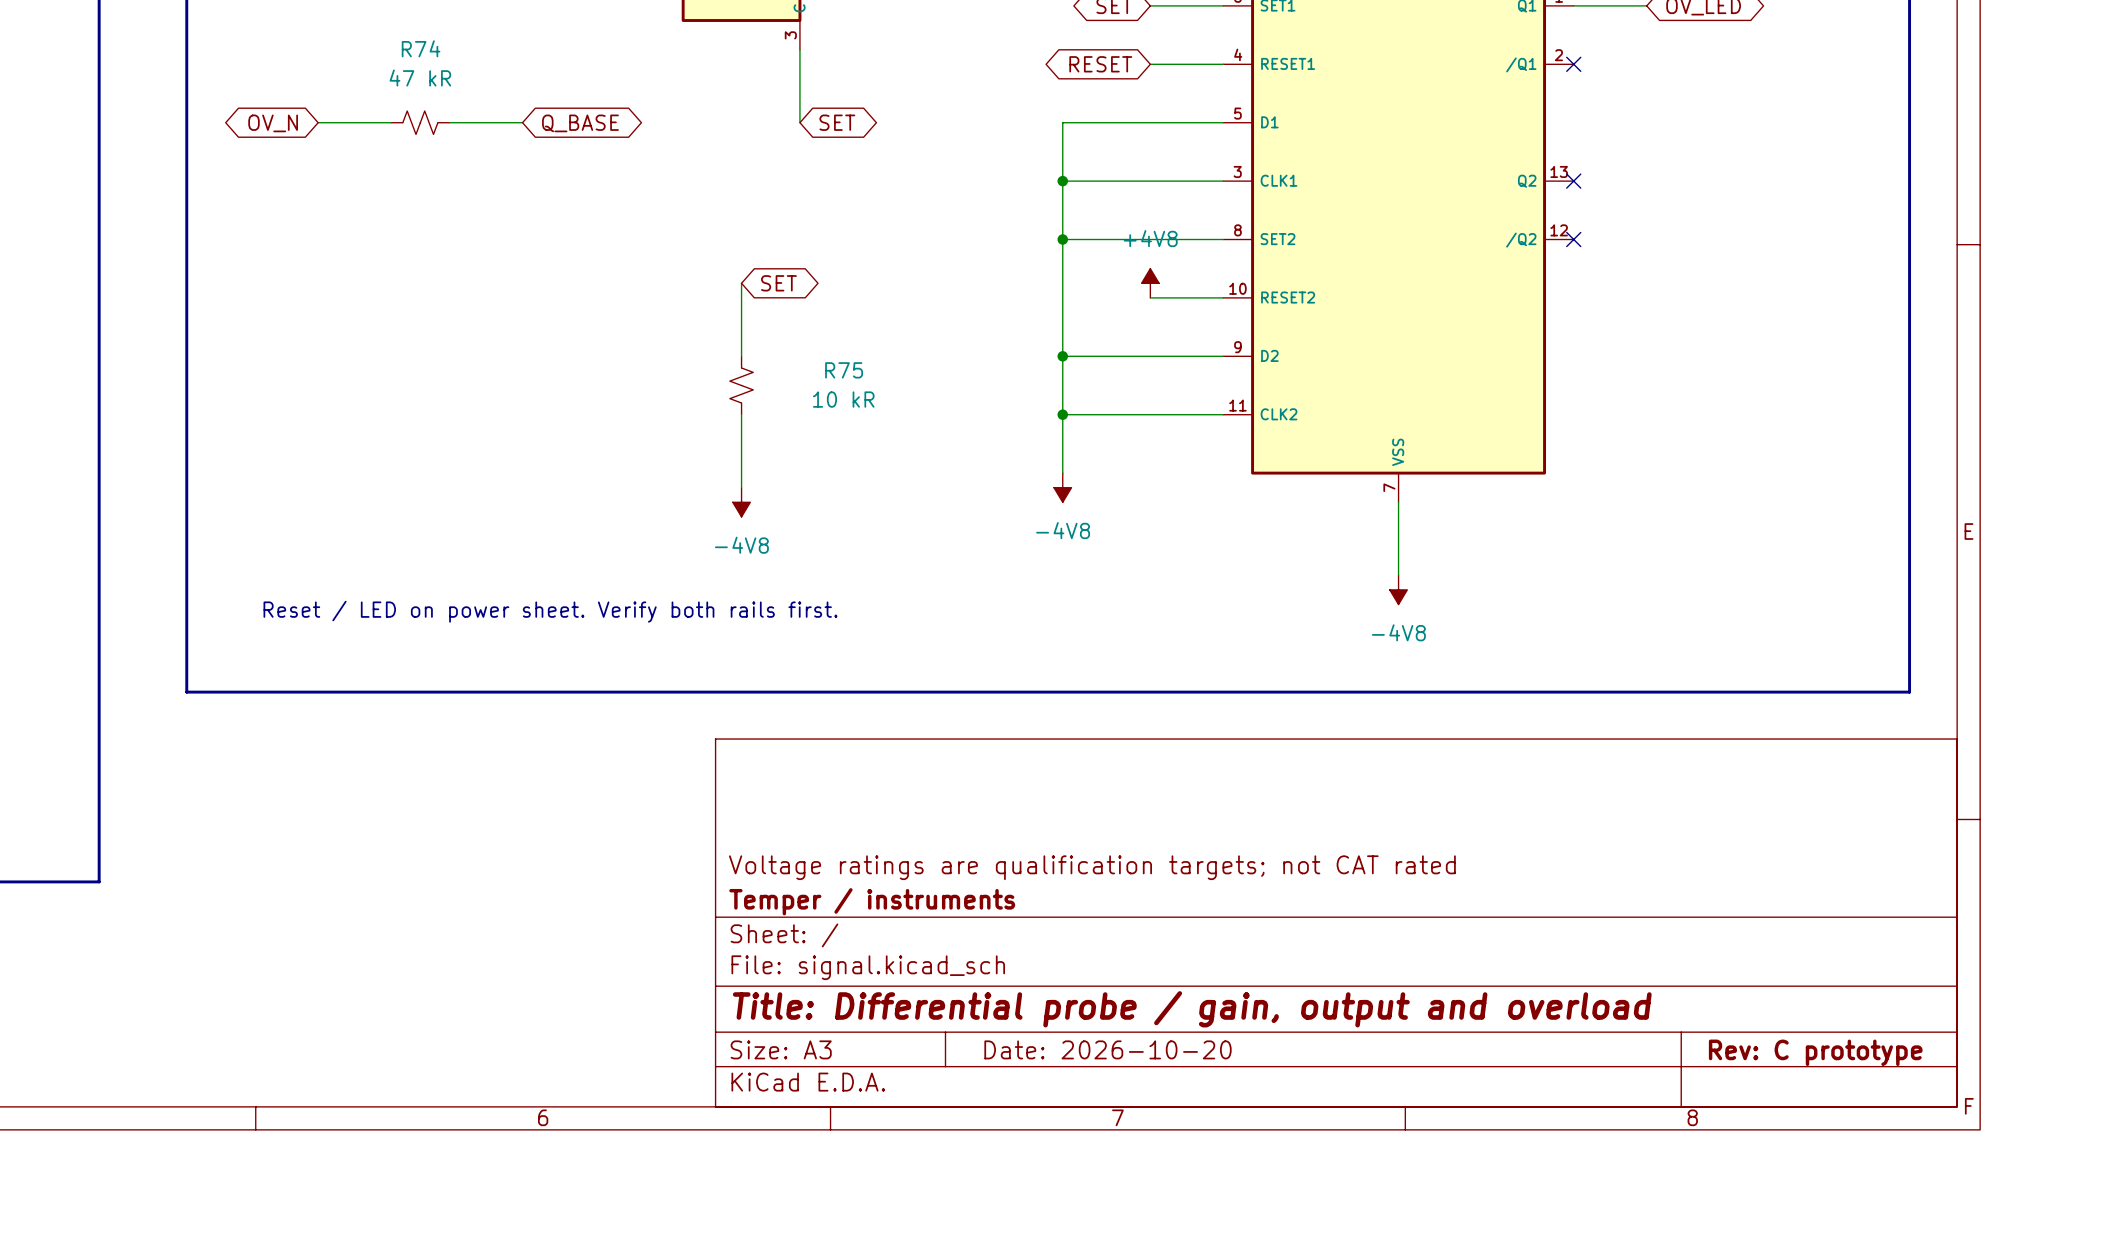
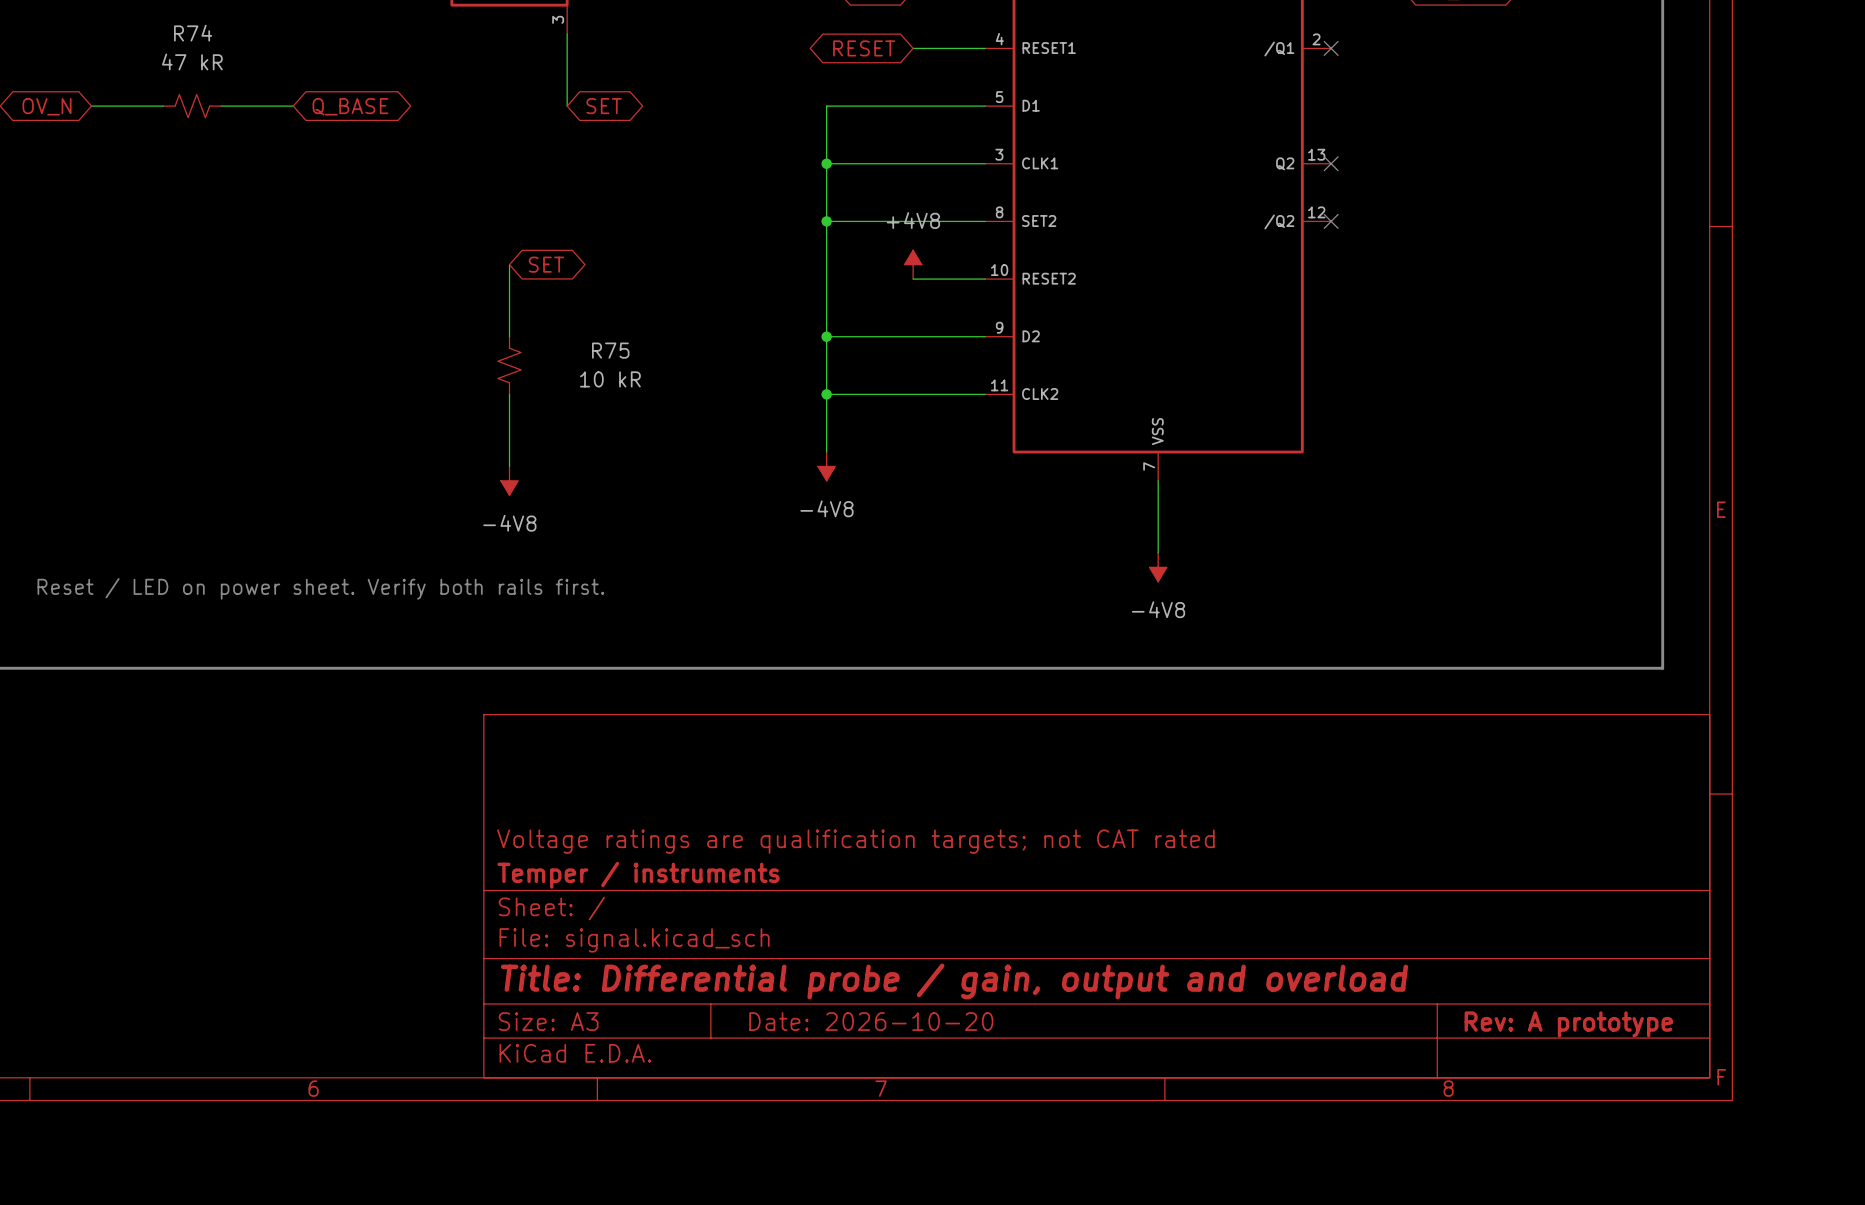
title block: Rev: C prototype (1815, 1052) -> Rev: A prototype (1568, 1024)

